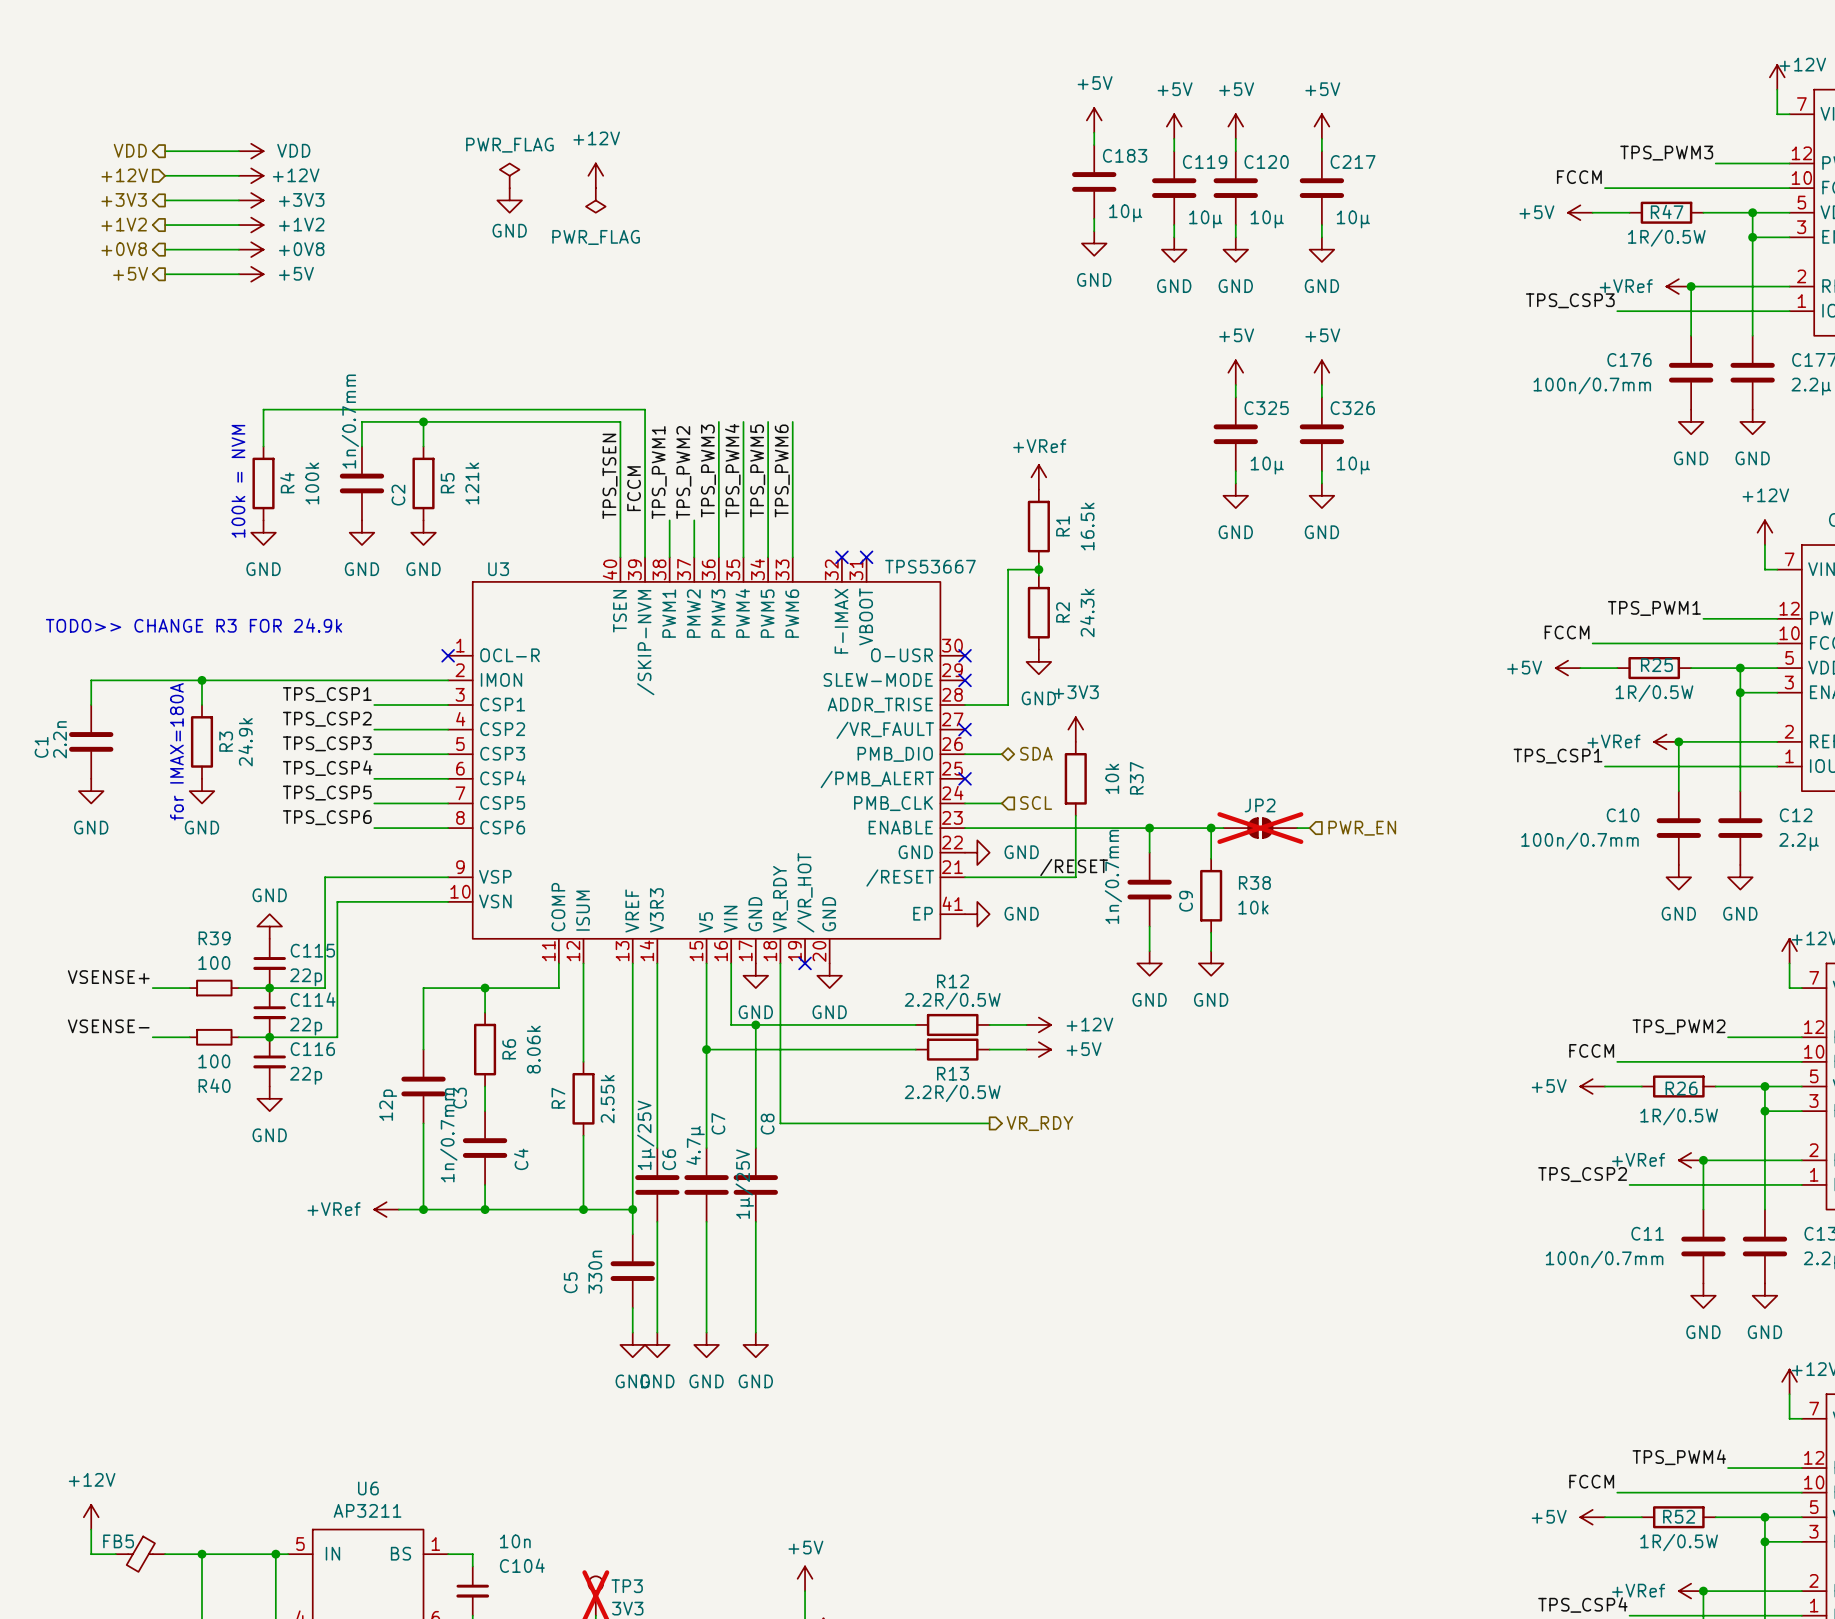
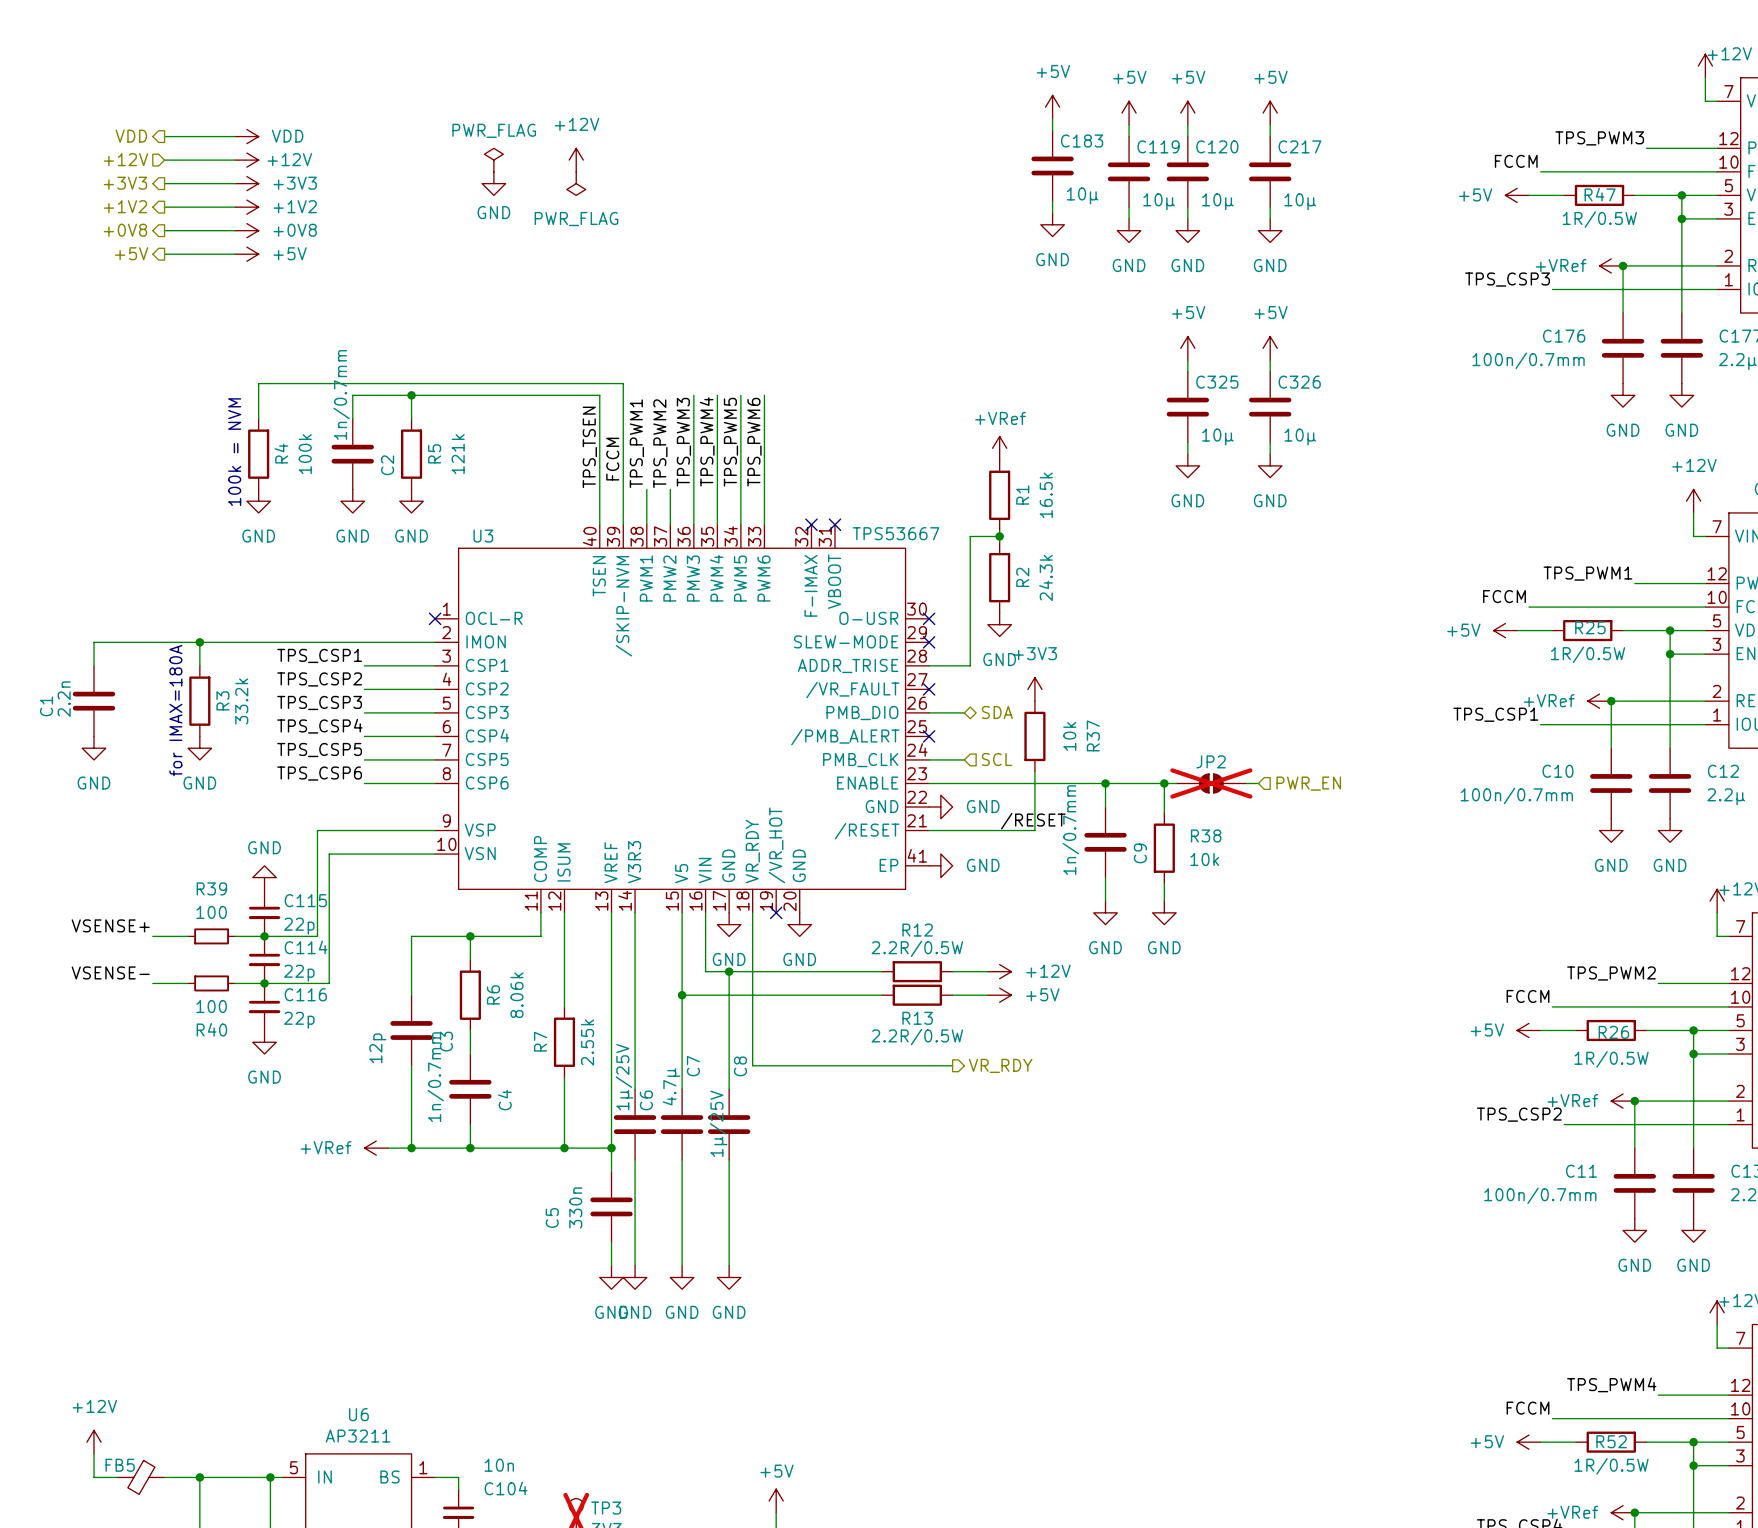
text: TODO>> CHANGE R3 FOR 24.9k (194, 625) -> none
R3 value: 24.9k (245, 742) -> 33.2k (241, 701)

